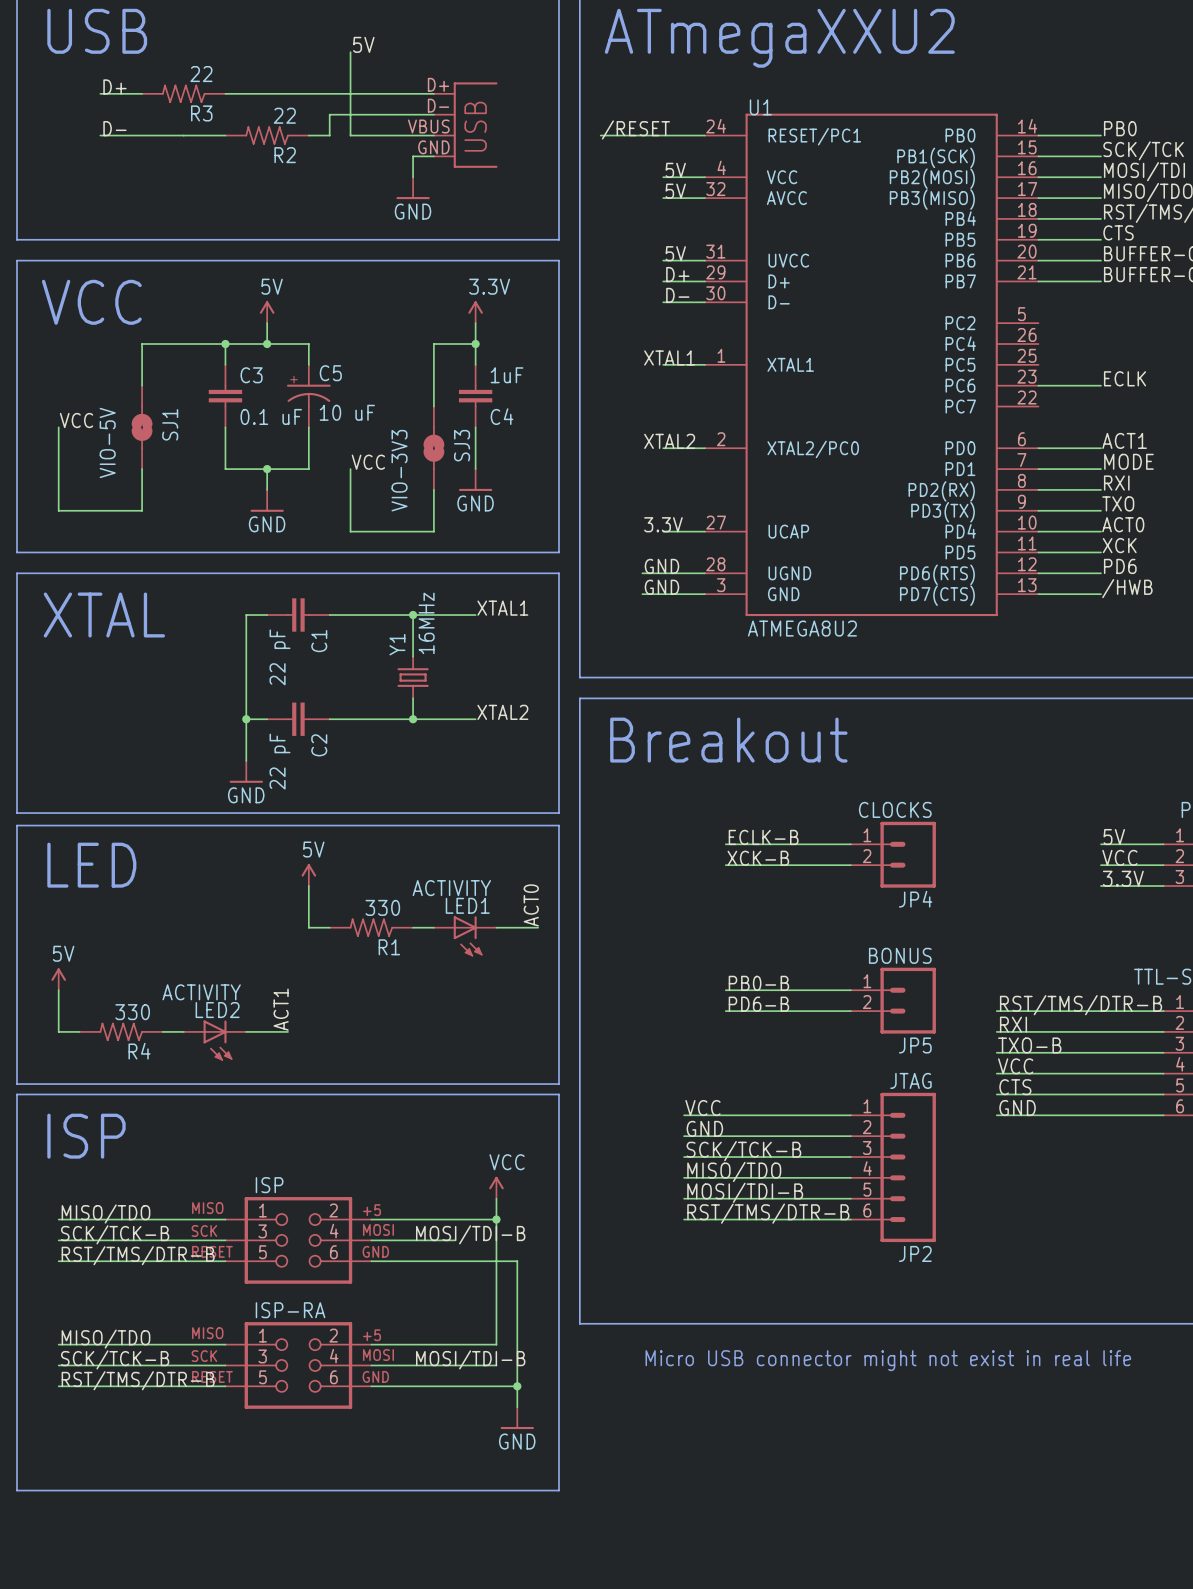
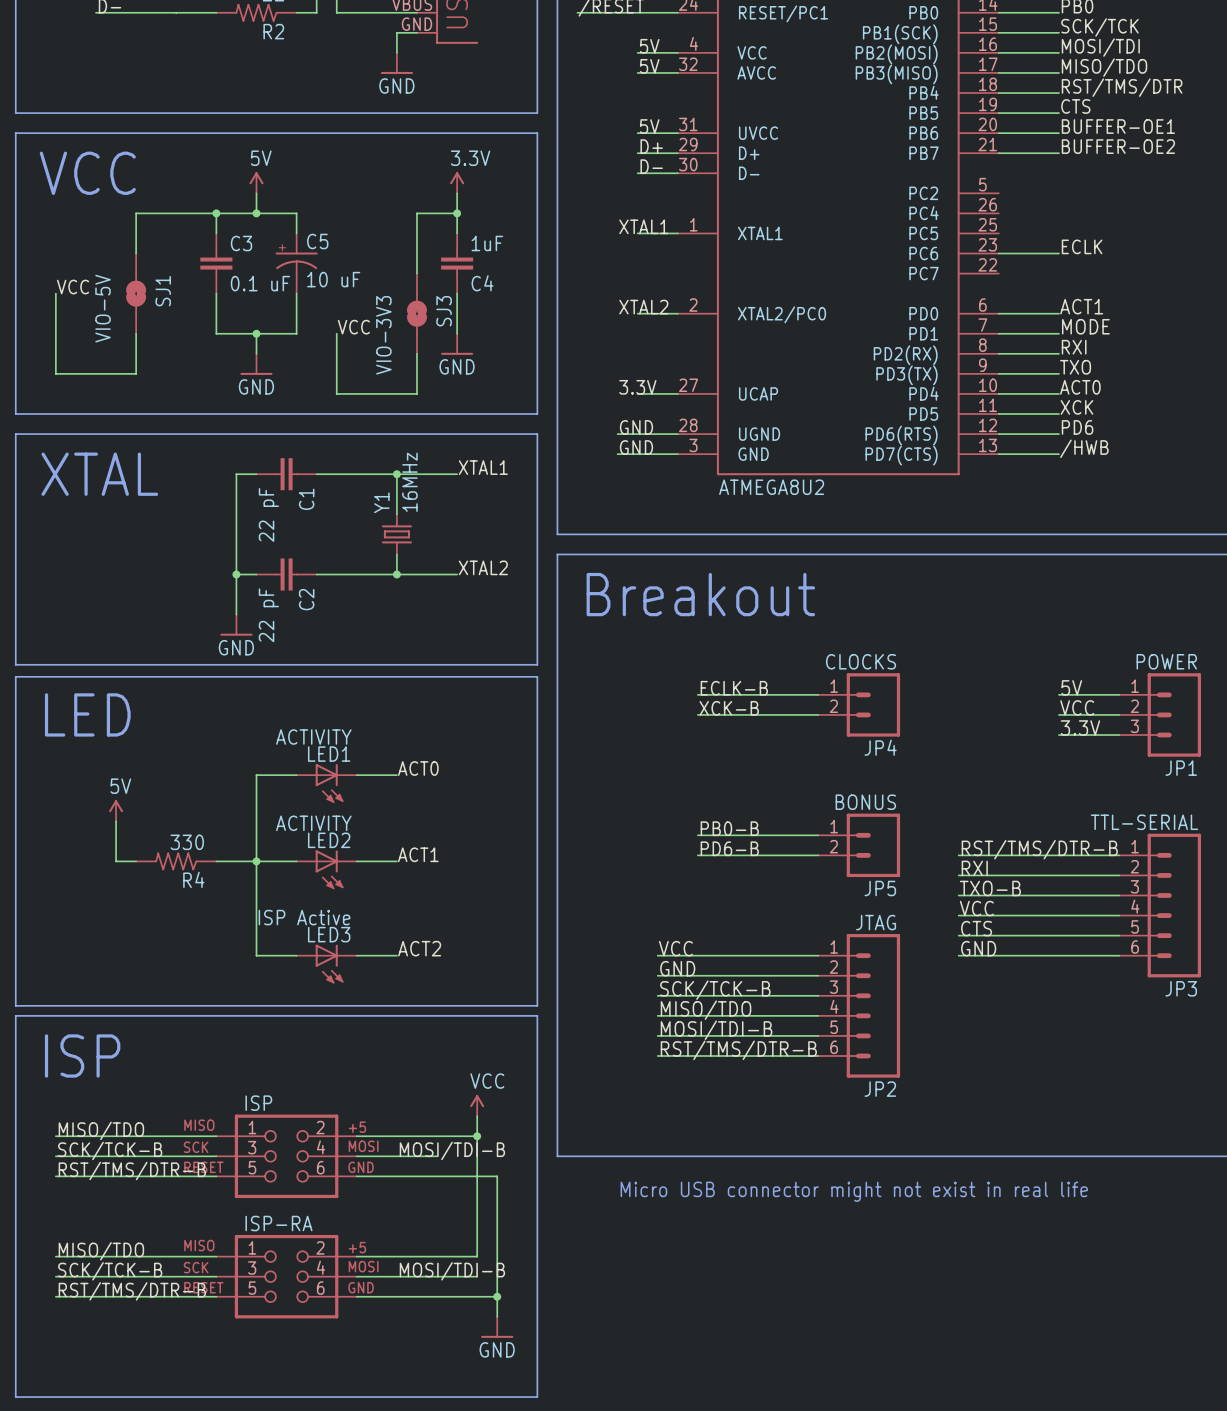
power symbol: 5V (308, 875) -> none
wire: (308, 886) (308, 927) (329, 927) -> none
label rotation: 0° (531, 905) -> 90° clockwise (418, 768)
label position: ACT0 (531, 905) -> ACT0 (418, 768)
wire: none -> (296, 775) (256, 775) (256, 955) (296, 955)
R1: 330 (371, 927) -> none
wire: (496, 927) (538, 927) -> none
LED1 position: (465, 936) -> (326, 783)
power symbol position: 5V (58, 979) -> 5V (116, 810)
wire: (58, 990) (58, 1031) (79, 1031) -> (116, 821) (116, 861) (136, 861)
label rotation: 0° (281, 1009) -> 90° clockwise (418, 854)
label position: ACT1 (281, 1009) -> ACT1 (418, 854)
wire: none -> (216, 861) (296, 861)
junction: none -> (256, 861)
R4 position: (121, 1031) -> (176, 861)
wire: (162, 1031) (183, 1031) -> none
wire: (246, 1031) (287, 1031) -> (356, 861) (396, 861)
LED2 position: (215, 1040) -> (326, 869)
line: (16, 1084) (559, 1084) -> (15, 925) (15, 935)
line: (16, 1094) (559, 1094) -> (537, 925) (537, 935)
label: none -> ACT2 (419, 948)
wire: none -> (356, 955) (396, 955)
LED3: none -> ISP Active (326, 964)
text position: ISP (86, 1136) -> ISP (82, 1056)
line: (16, 1167) (16, 1177) -> (15, 1005) (537, 1005)
line: (559, 1167) (559, 1177) -> (15, 1015) (537, 1015)
power symbol position: VCC (496, 1187) -> VCC (477, 1105)
wire: (496, 1198) (496, 1282) -> none
label position: MISO/TDO (105, 1213) -> MISO/TDO (101, 1130)
wire: (58, 1219) (225, 1219) -> (55, 1136) (216, 1136)
wire: (371, 1219) (496, 1219) -> (356, 1136) (477, 1136)
junction: (496, 1219) -> none
label: SCK/TCK-B (115, 1234) -> none
label: MOSI/TDI-B (470, 1234) -> none
wire: (58, 1240) (225, 1240) -> (55, 1156) (216, 1156)
ISP position: (298, 1240) -> (286, 1156)
wire: (371, 1240) (454, 1240) -> (356, 1156) (437, 1156)
label: RST/TMS/DTR-B (138, 1255) -> none
wire: (58, 1261) (225, 1261) -> (55, 1256) (216, 1256)
wire: (371, 1261) (517, 1261) (517, 1344) -> (356, 1256) (477, 1256) (477, 1176) (497, 1176)
junction: none -> (477, 1136)
label: none -> SCK/TCK-B (110, 1150)
label: none -> MOSI/TDI-B (452, 1150)
label: MISO/TDO (105, 1339) -> RST/TMS/DTR-B (132, 1171)
label: SCK/TCK-B (115, 1359) -> none
label: MOSI/TDI-B (470, 1359) -> none
wire: (58, 1365) (225, 1365) -> (55, 1276) (216, 1276)
ISP-RA position: (298, 1365) -> (286, 1276)
wire: (371, 1365) (496, 1365) -> (356, 1276) (477, 1276)
label position: RST/TMS/DTR-B (138, 1380) -> RST/TMS/DTR-B (132, 1291)
wire: (58, 1386) (225, 1386) -> (55, 1296) (216, 1296)
wire: (371, 1386) (517, 1386) -> (356, 1296) (497, 1296)
junction: (517, 1386) -> none
wire: none -> (497, 1236) (497, 1316)
power symbol position: GND (517, 1418) -> GND (497, 1327)
label: none -> MISO/TDO (101, 1251)
label: none -> SCK/TCK-B (110, 1271)
label: none -> MOSI/TDI-B (452, 1271)
junction: none -> (497, 1296)
line: (16, 1490) (559, 1490) -> (15, 1316) (15, 1397) (537, 1397) (537, 1316)

